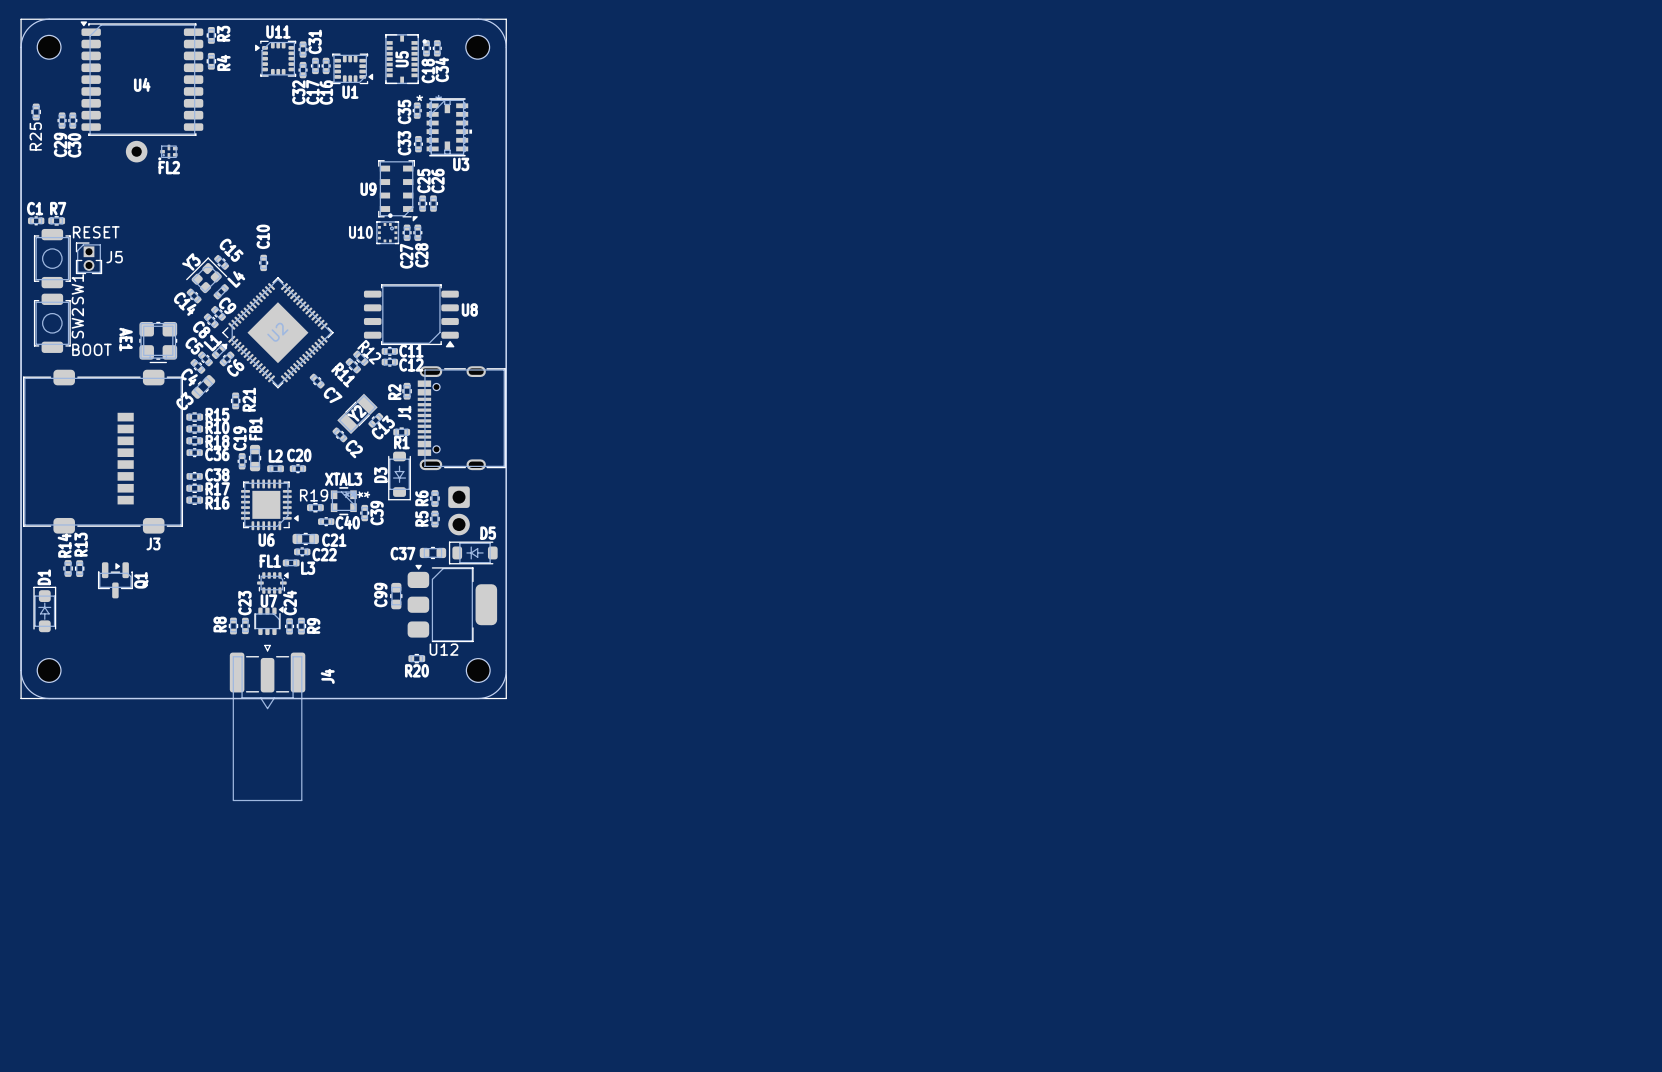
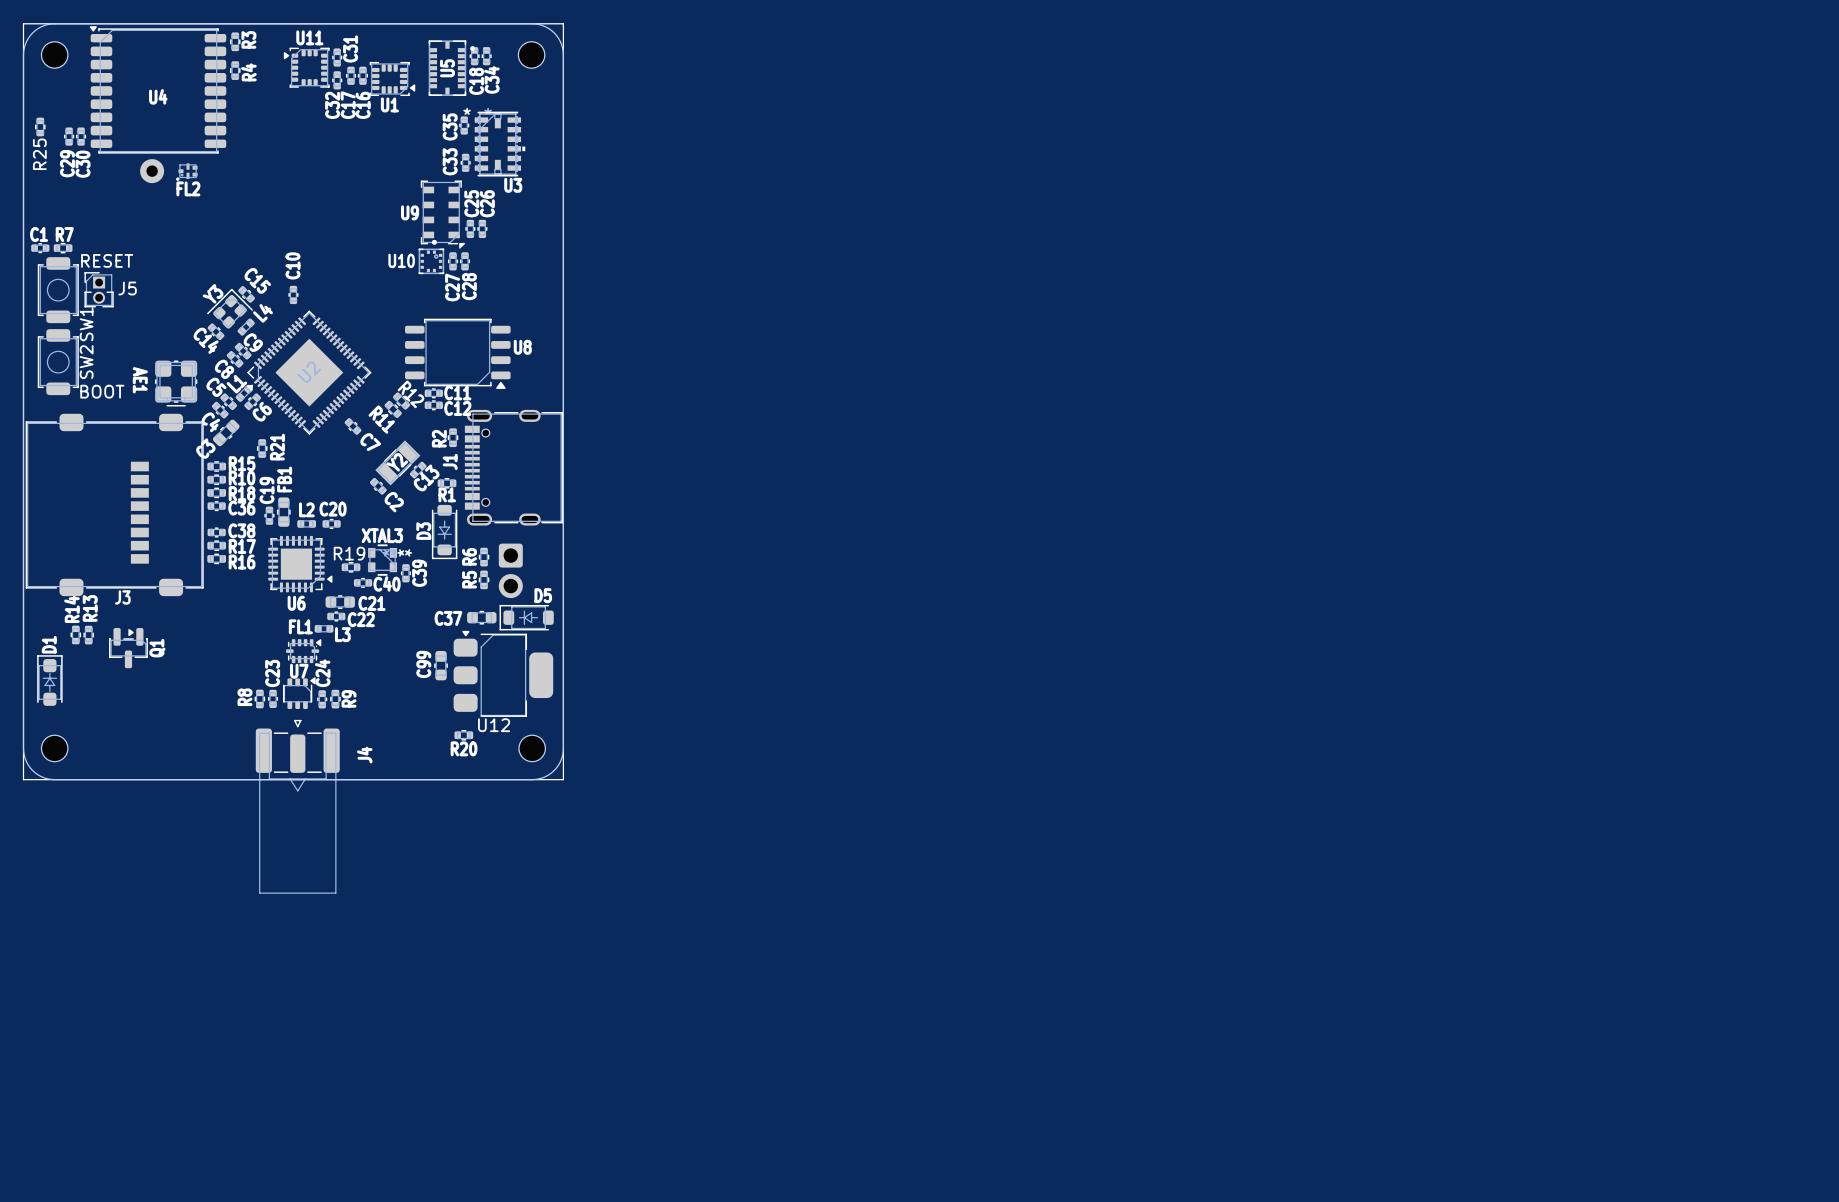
J3 name position: J3 (153, 543) -> J3 (122, 597)

